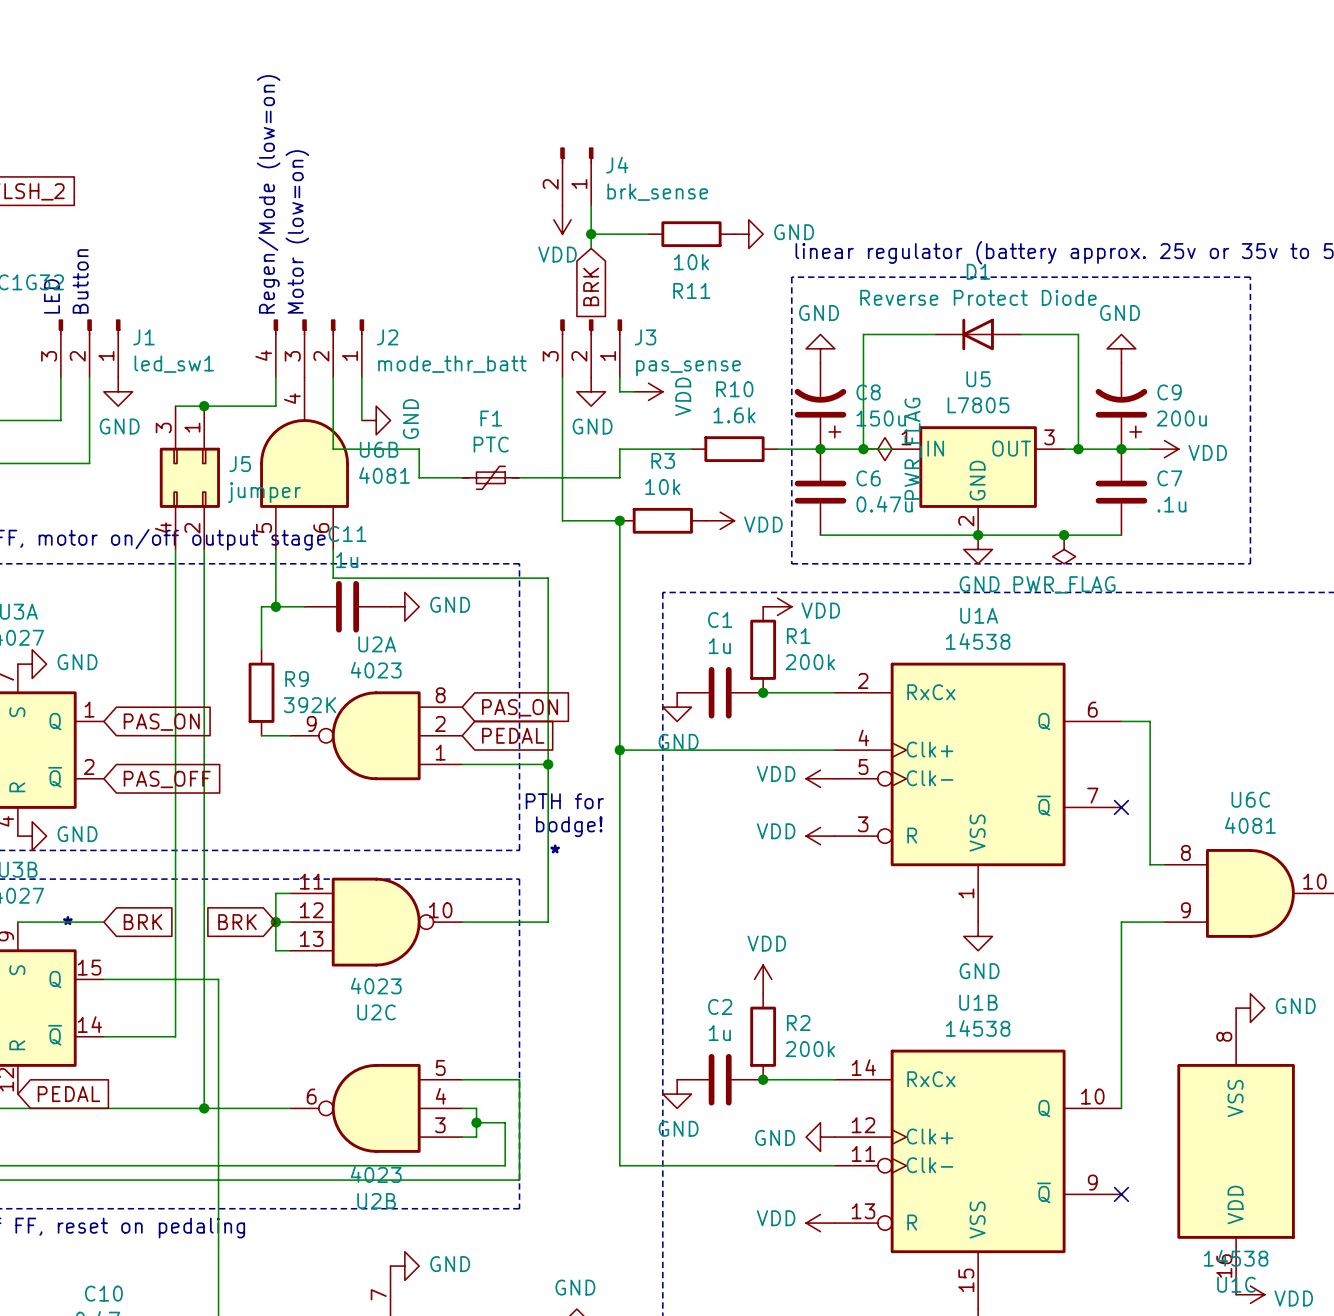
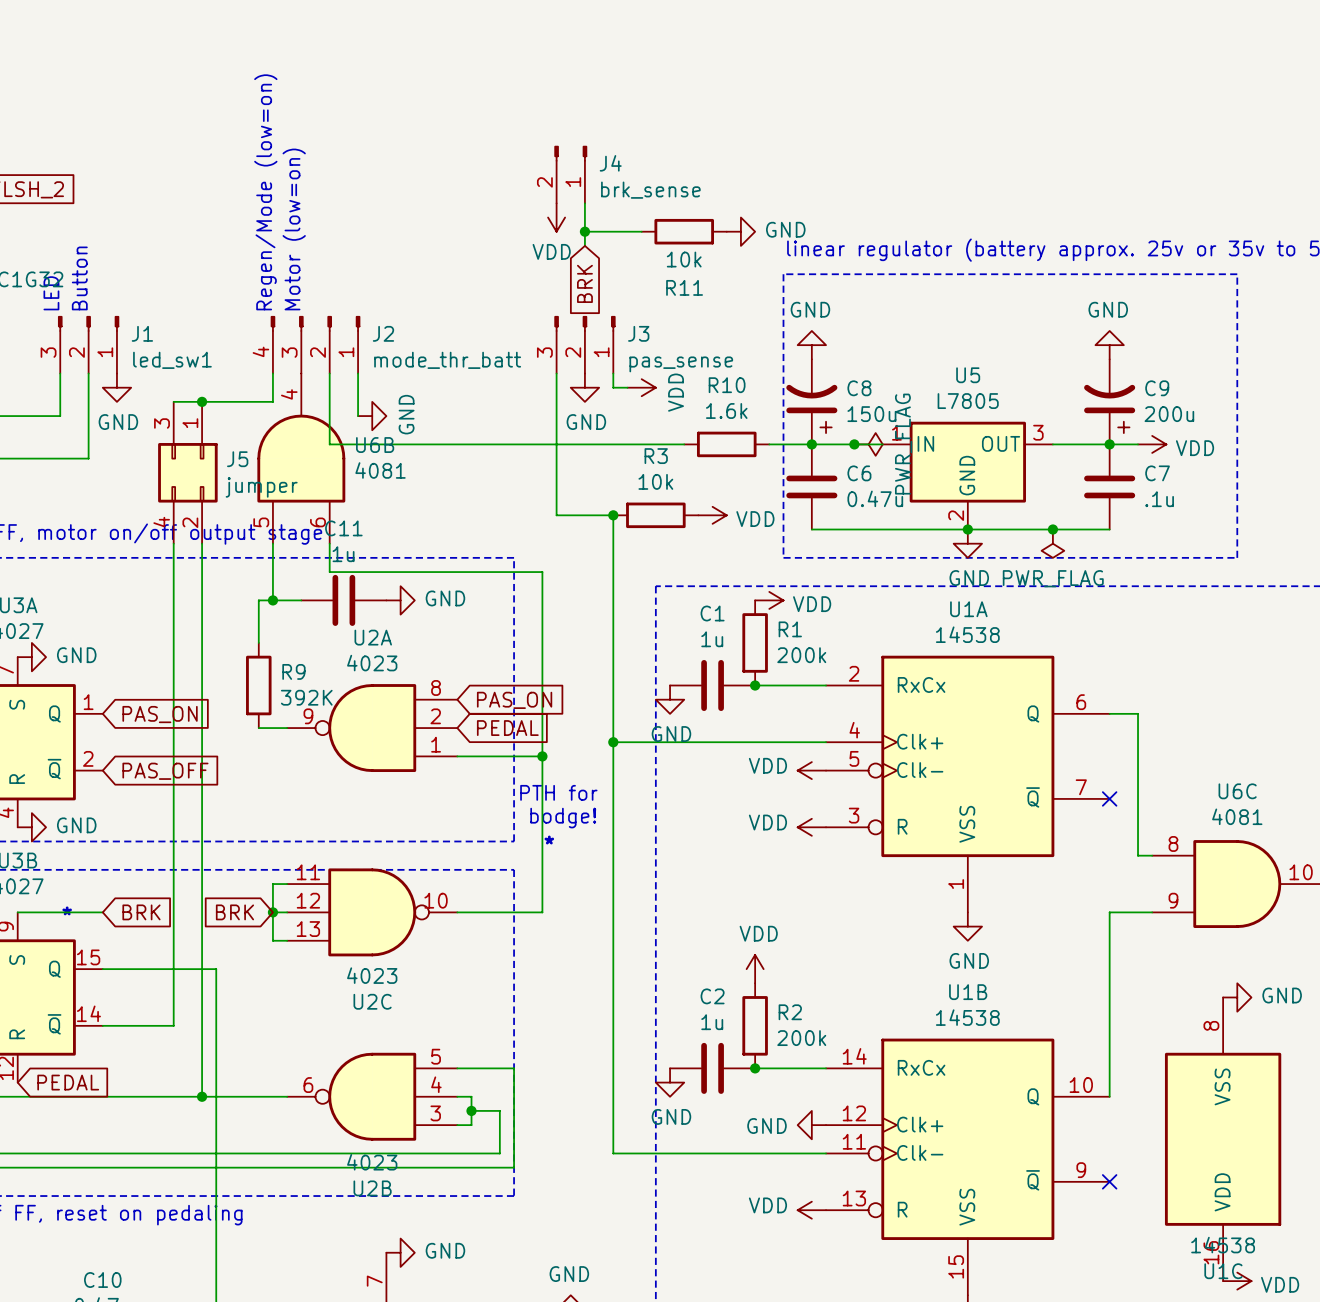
wire: (935, 334) (863, 334) (863, 449) -> none
D1: Reverse Protect Diode (978, 334) -> none
wire: (1021, 334) (1078, 334) (1078, 449) -> none
wire: (419, 449) (419, 477) (462, 477) -> none
wire: (619, 449) (619, 477) (519, 477) -> (613, 444) (414, 444)
junction: (1078, 449) -> none
F1: PTC (490, 477) -> none

